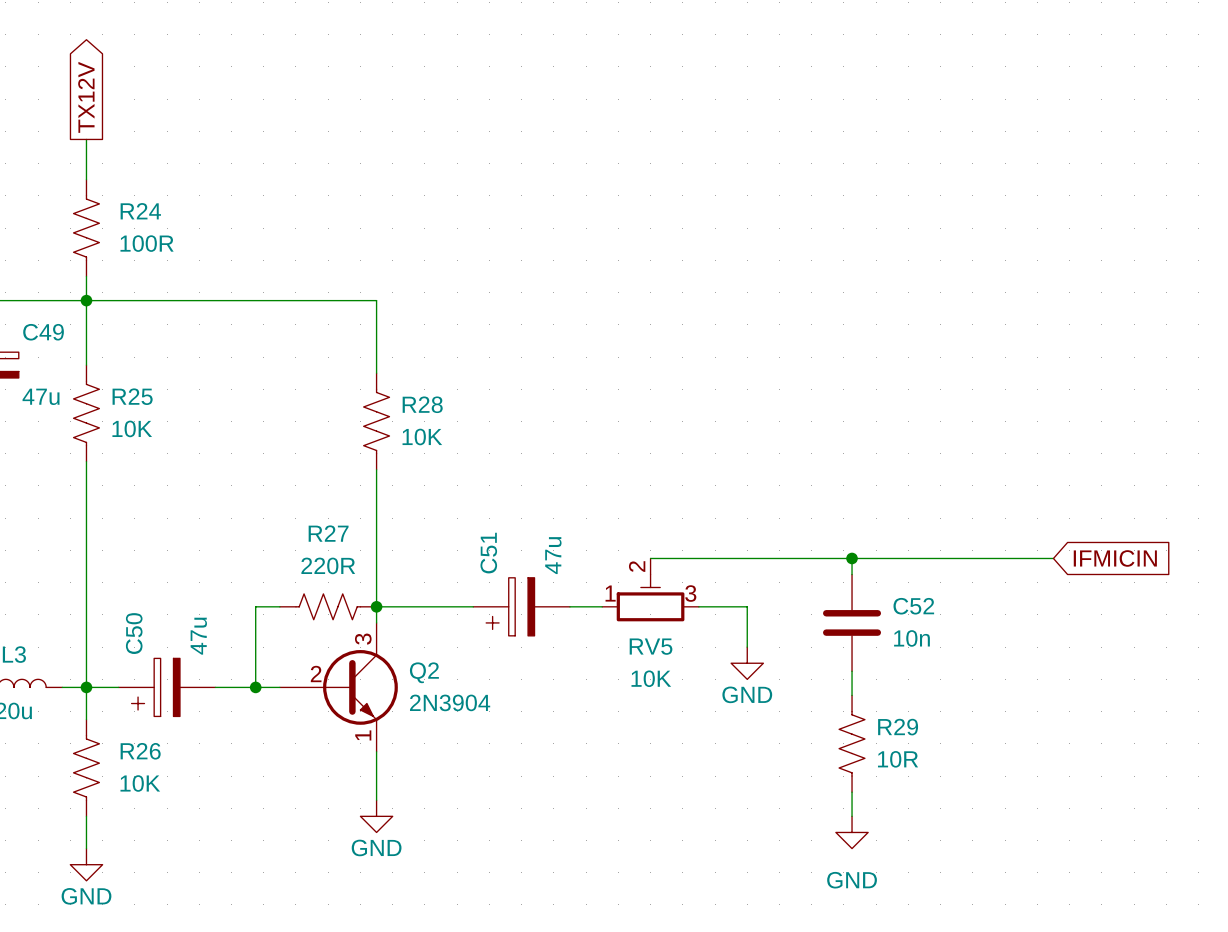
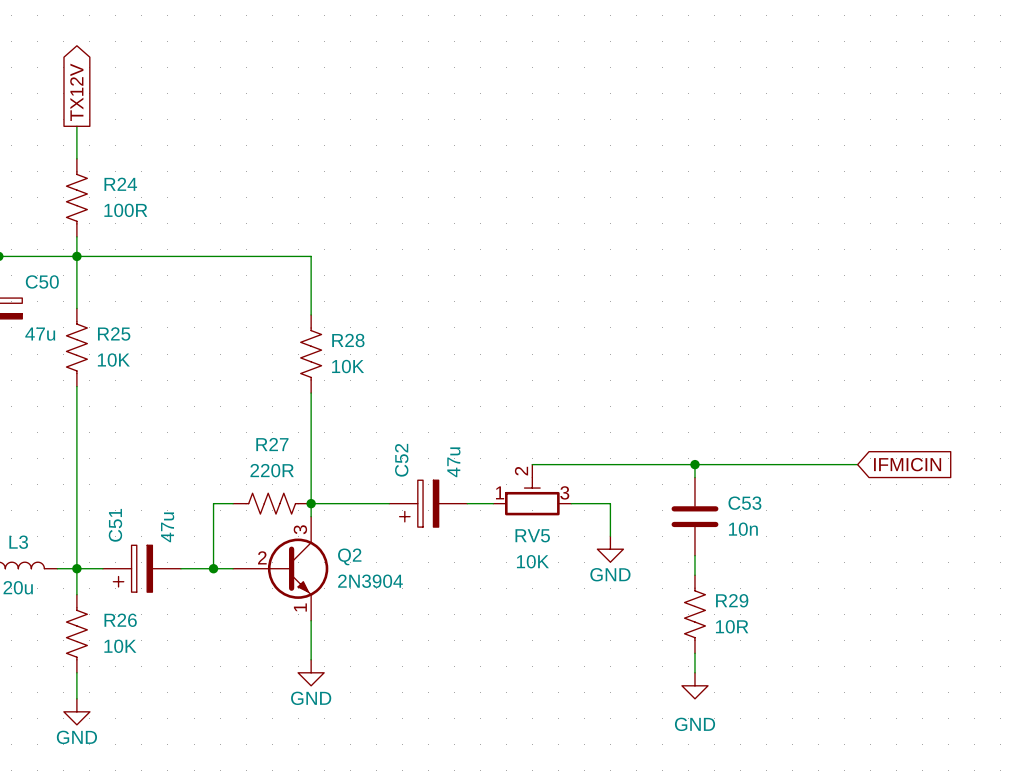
C49 name: C49 (43, 332) -> C50 (42, 281)
C51 name: C51 (488, 553) -> C52 (401, 460)
C52 name: C52 (913, 606) -> C53 (744, 503)
C50 name: C50 (134, 633) -> C51 (115, 525)

